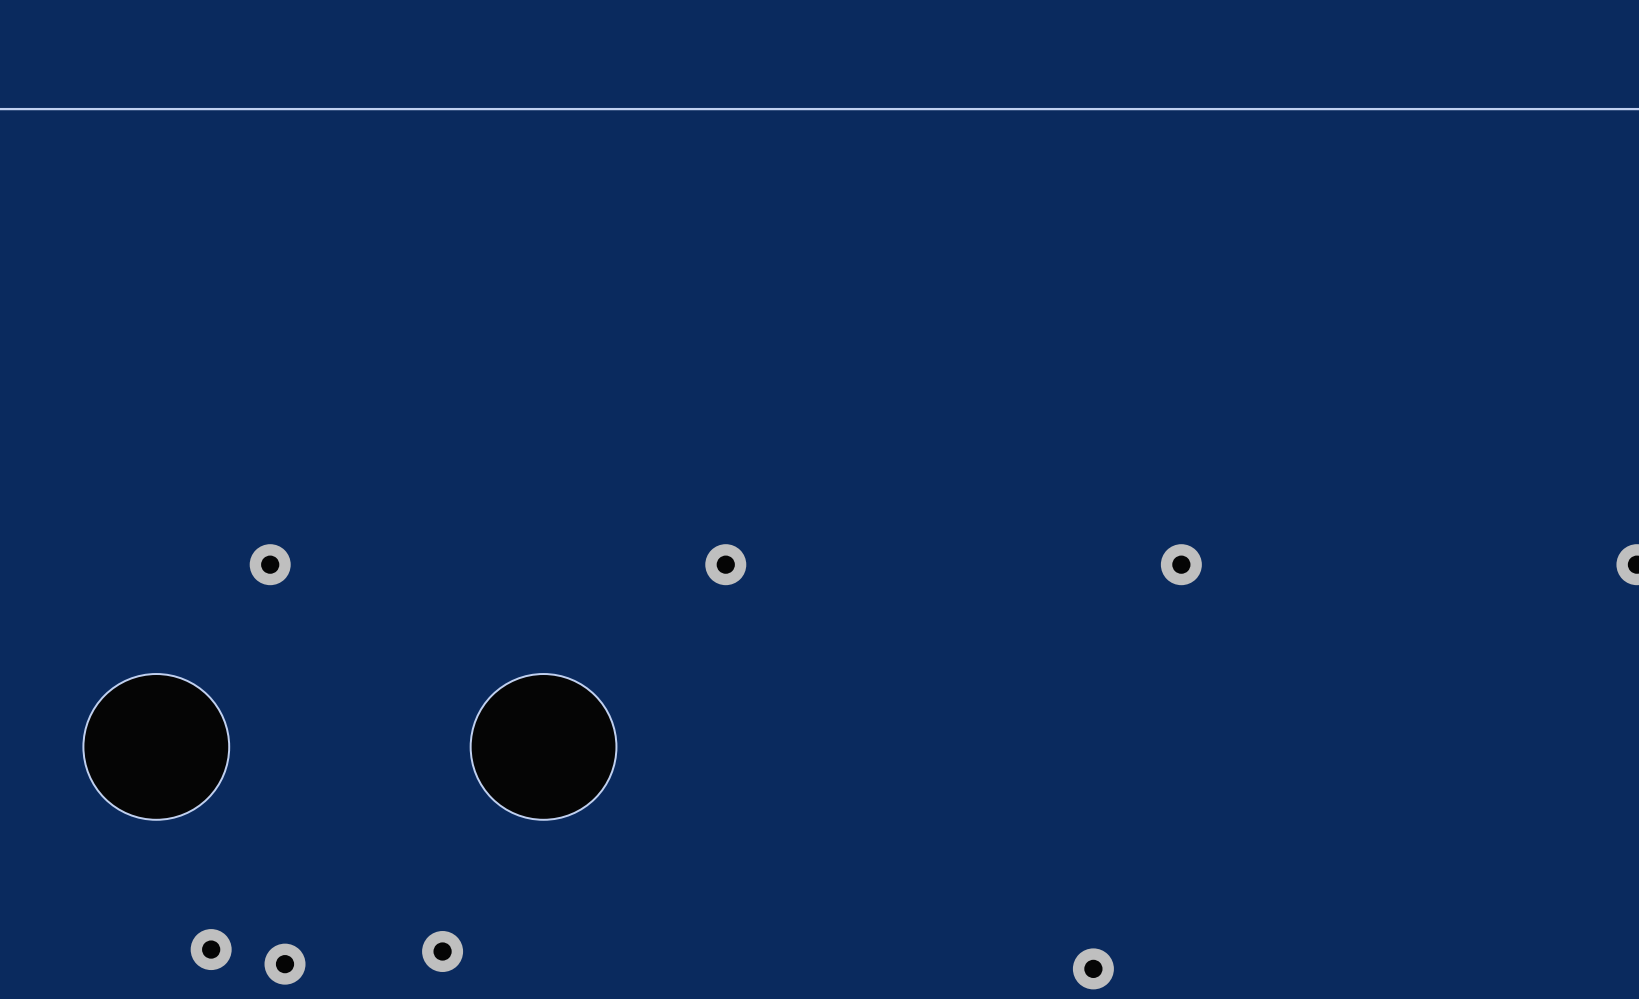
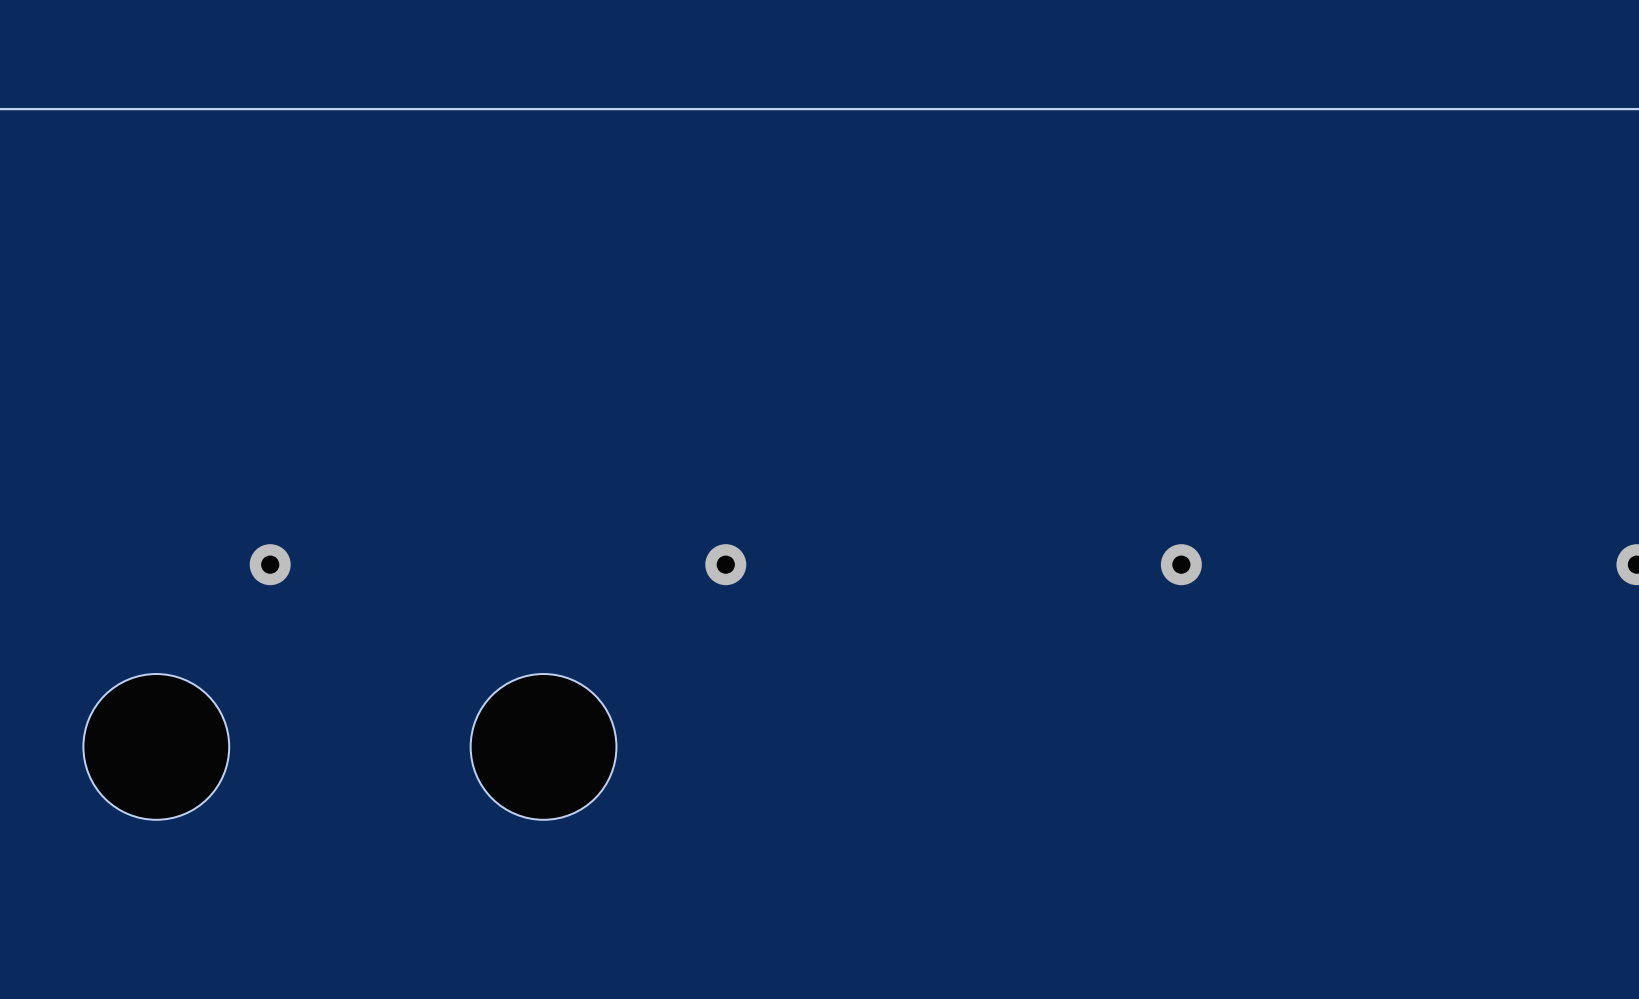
via: (211, 949) -> none
via: (442, 951) -> none
via: (285, 964) -> none
via: (1093, 968) -> none

